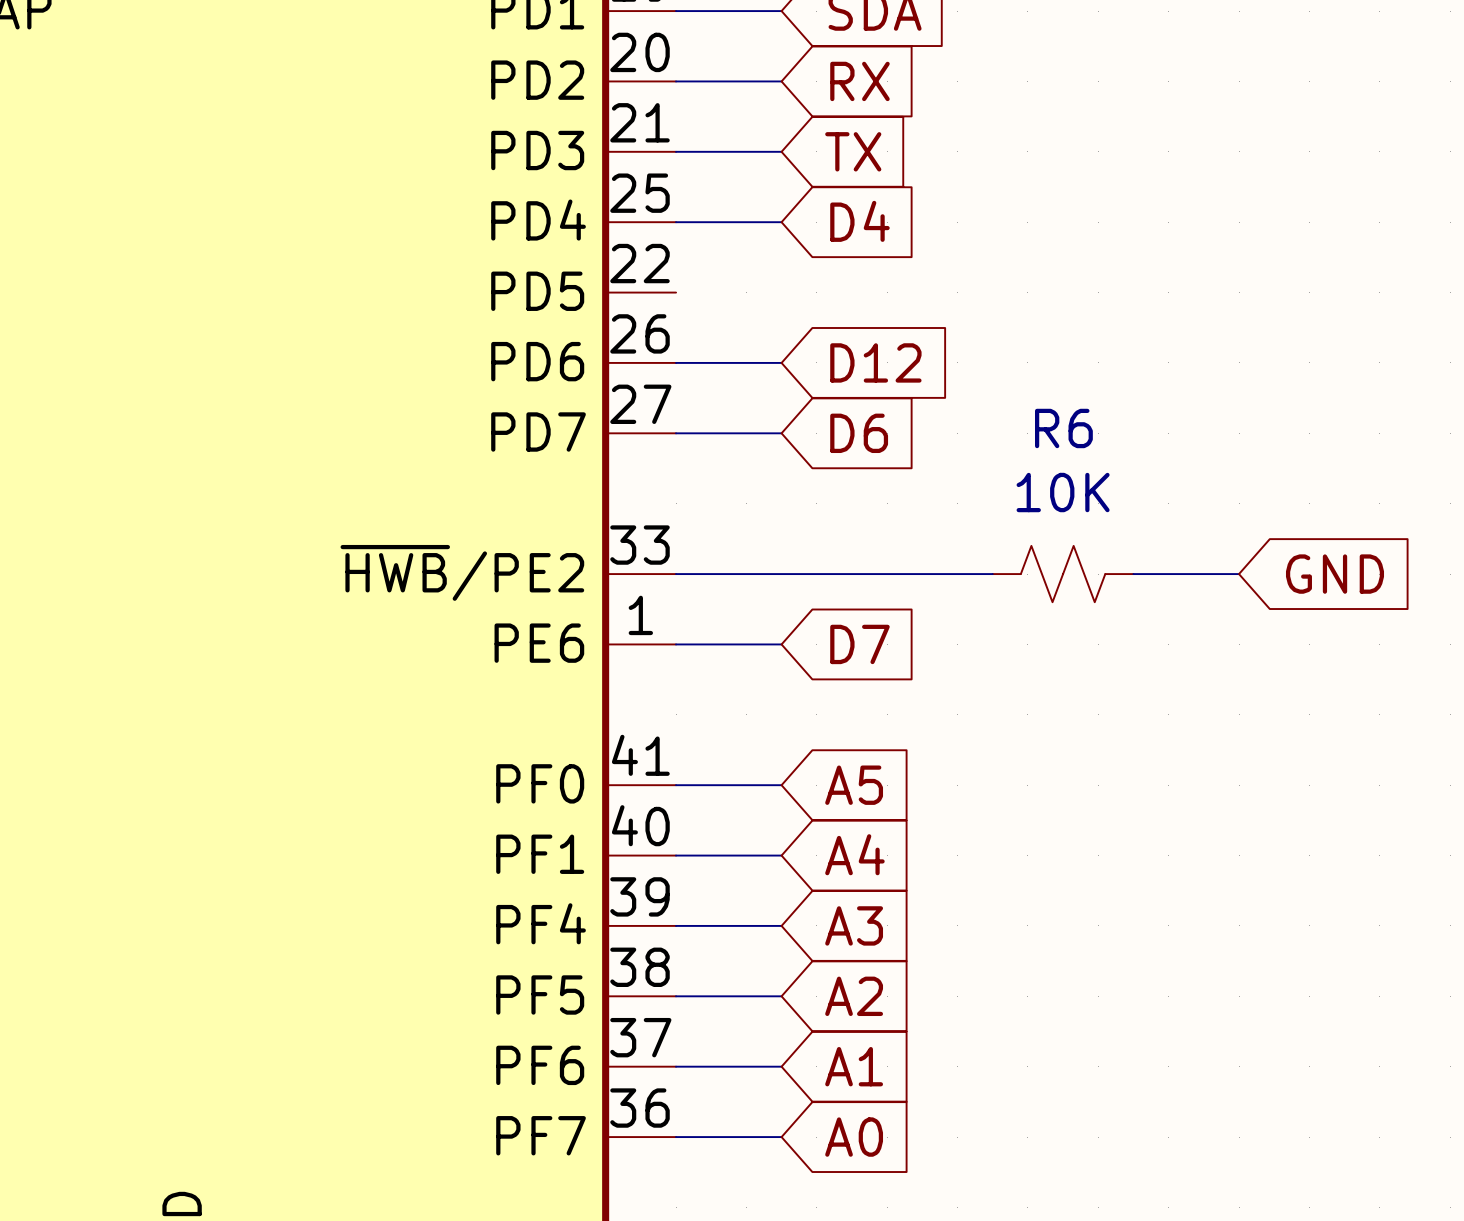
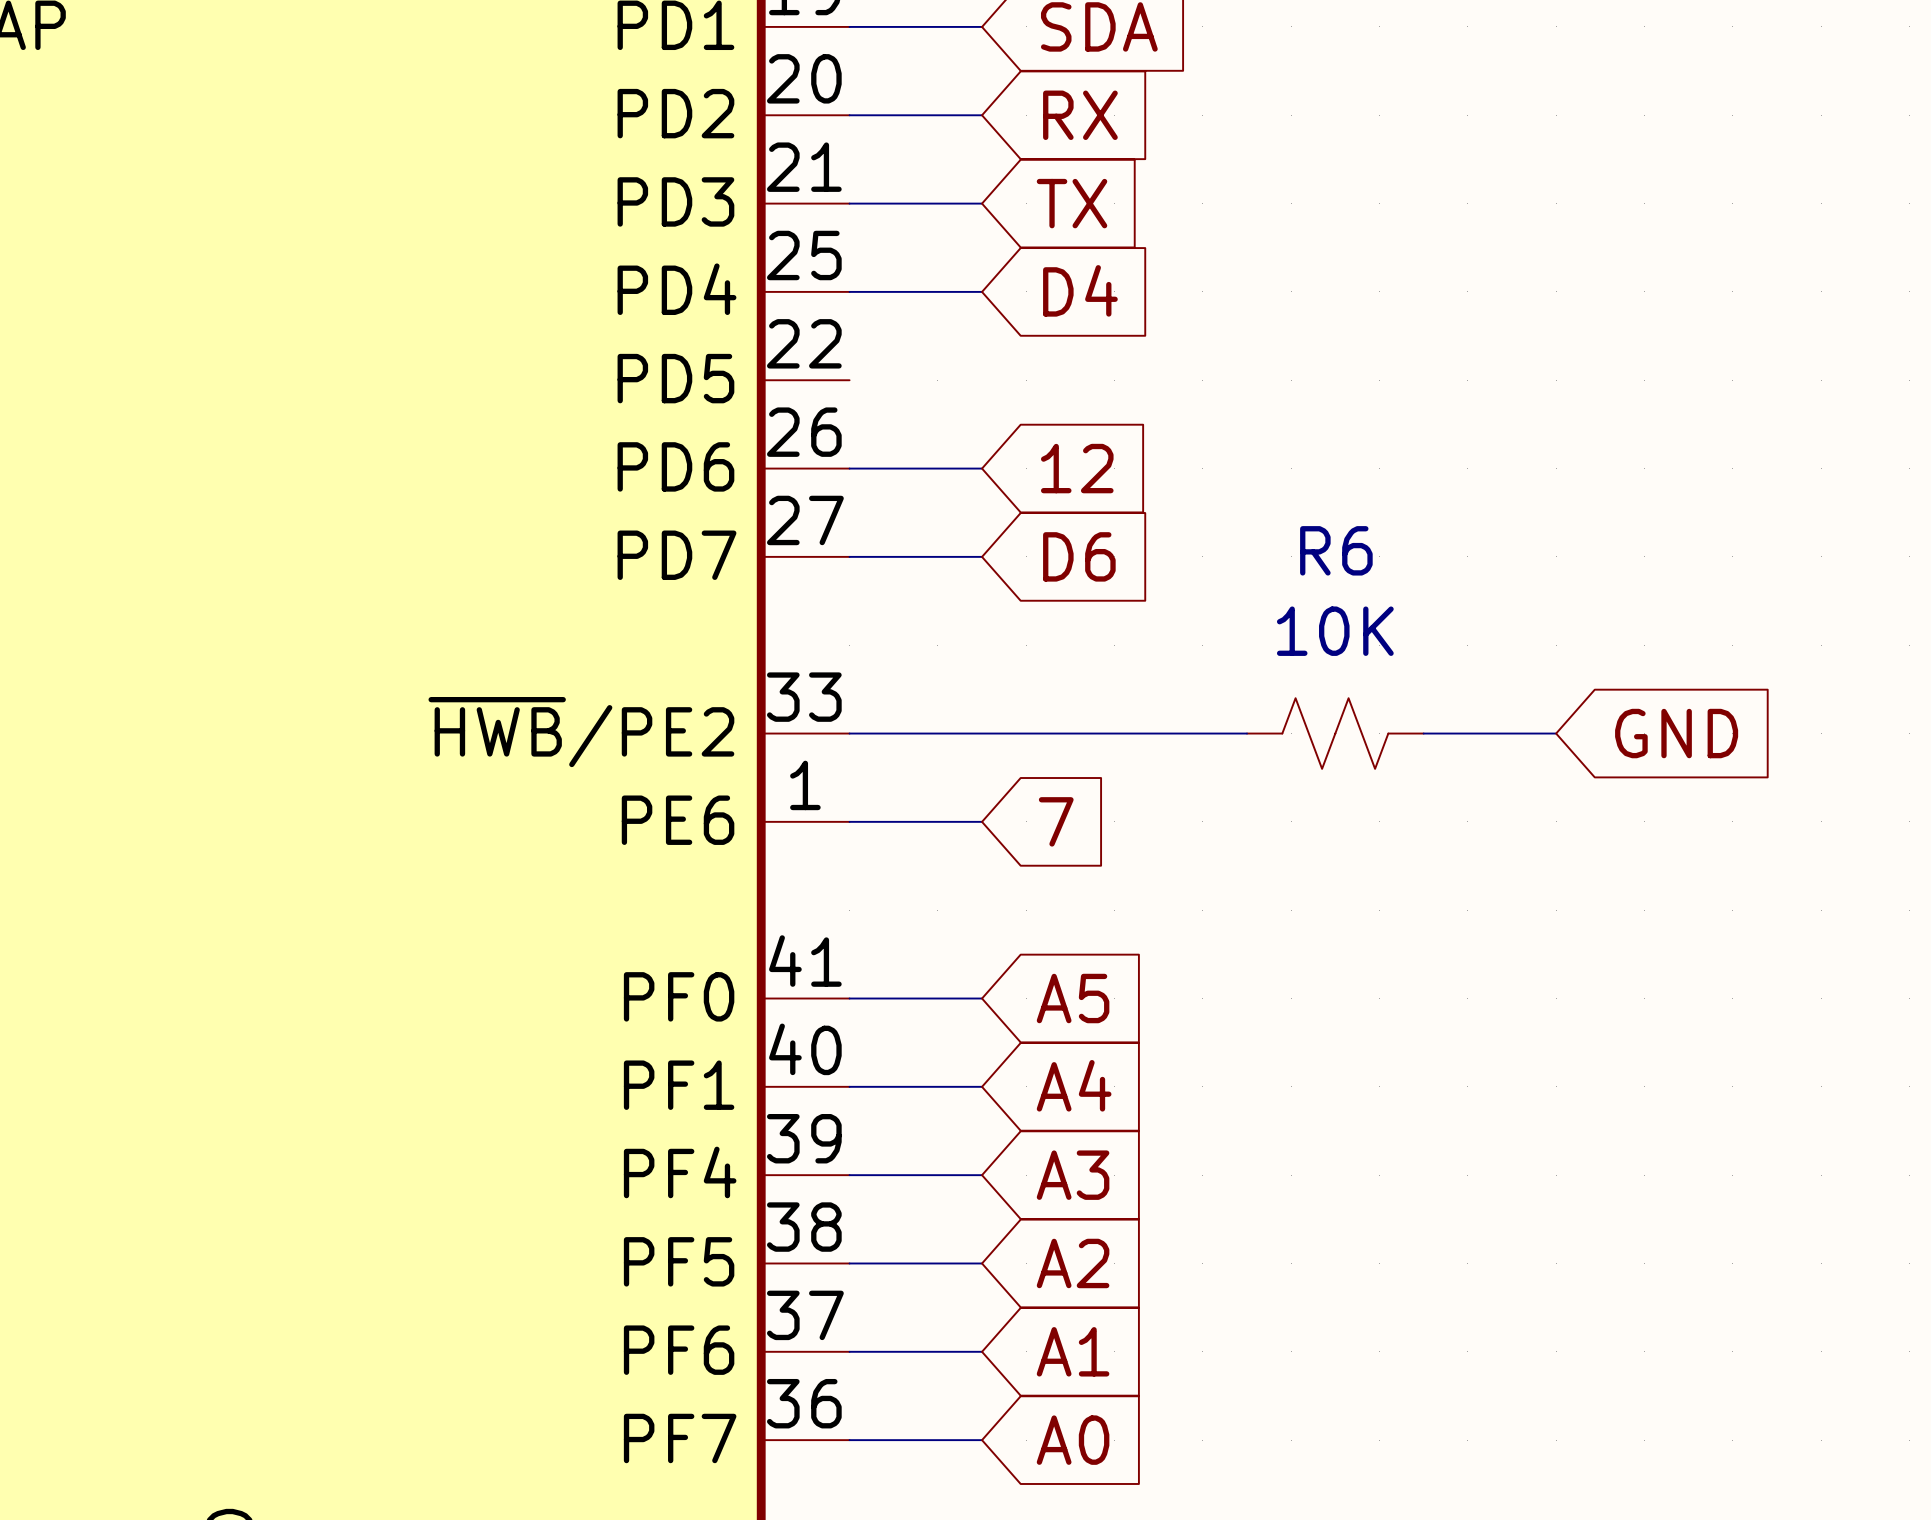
global label: D12 (875, 362) -> 12 (1077, 468)
global label: D7 (859, 644) -> 7 (1056, 821)

